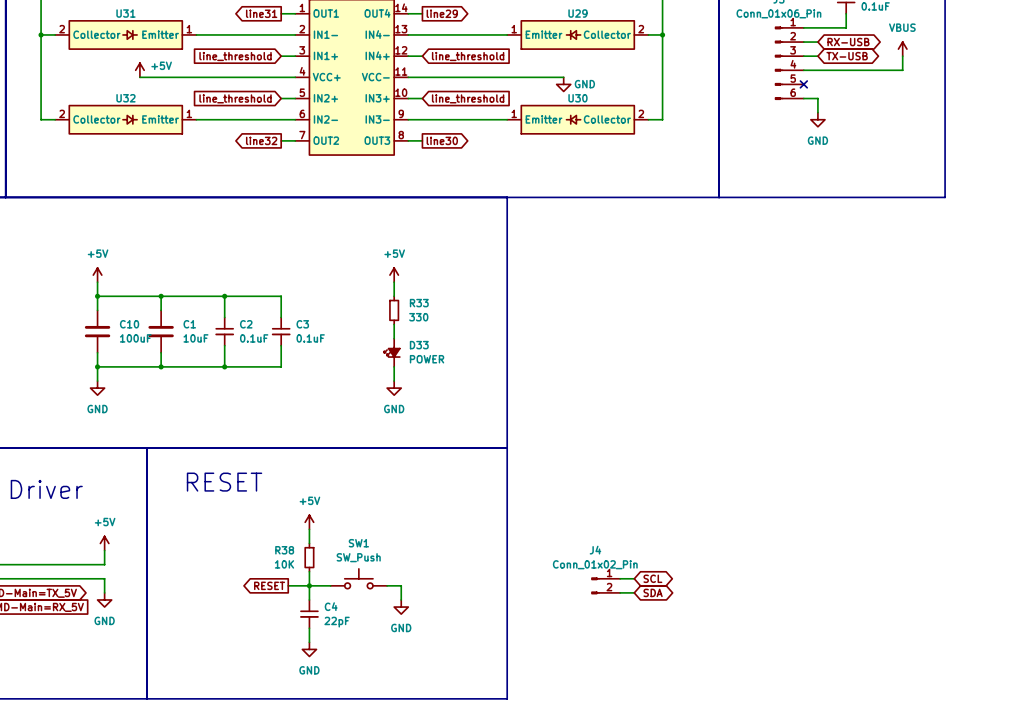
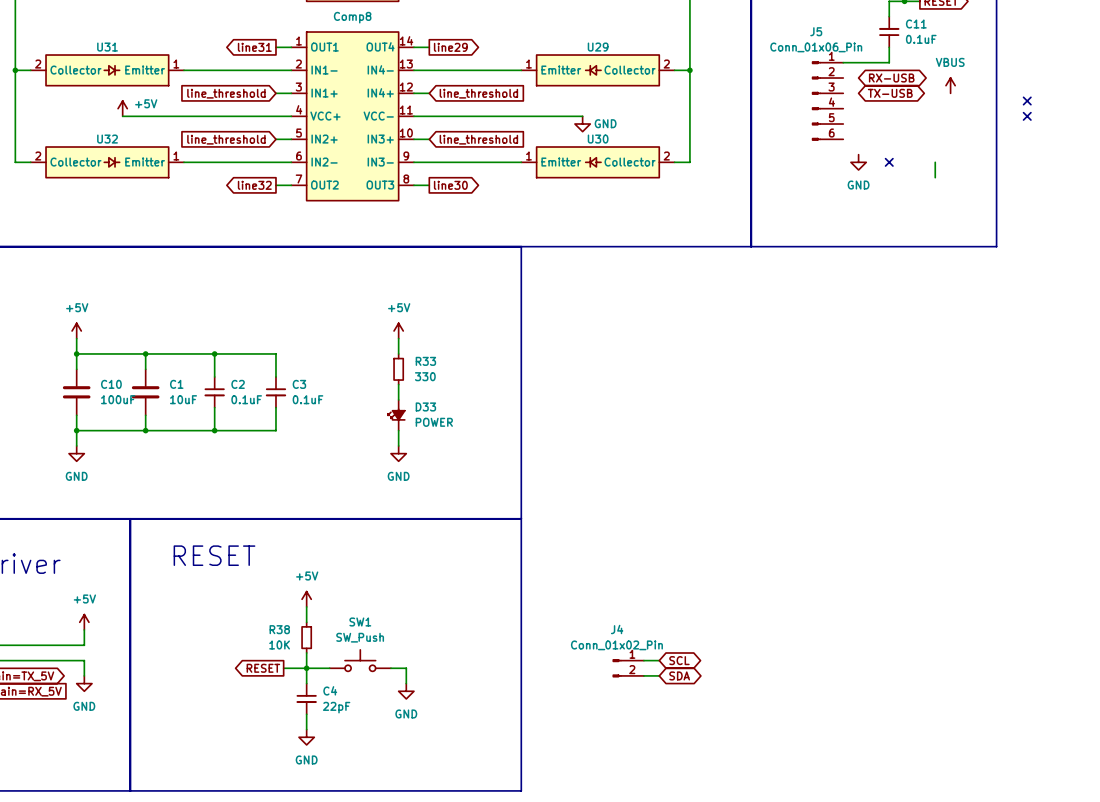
wire: (803, 42) (817, 42) -> none
wire: (803, 56) (817, 56) -> none
wire: (902, 56) (902, 70) (803, 70) -> none
no-connect mark: none -> (1027, 101)
no-connect mark: none -> (1027, 116)
no-connect mark: (803, 84) -> none
wire: (803, 98) (817, 98) (817, 112) -> none
no-connect mark: none -> (889, 162)
wire: none -> (935, 162) (935, 177)

